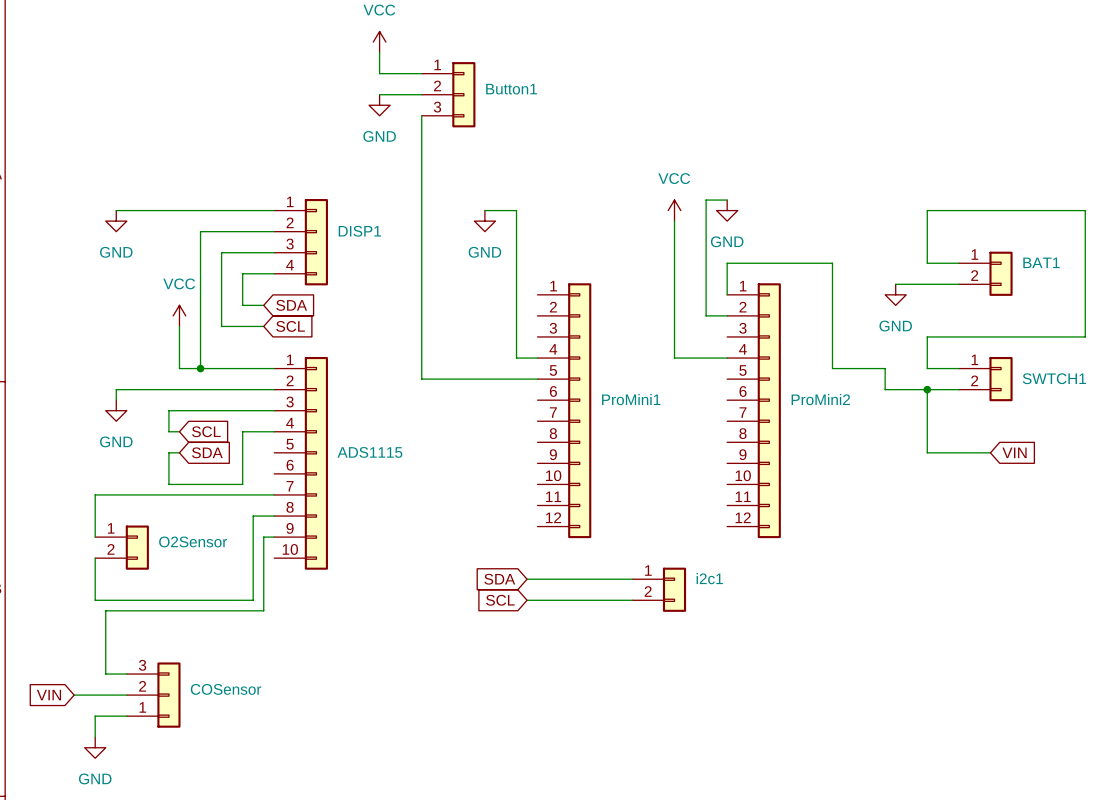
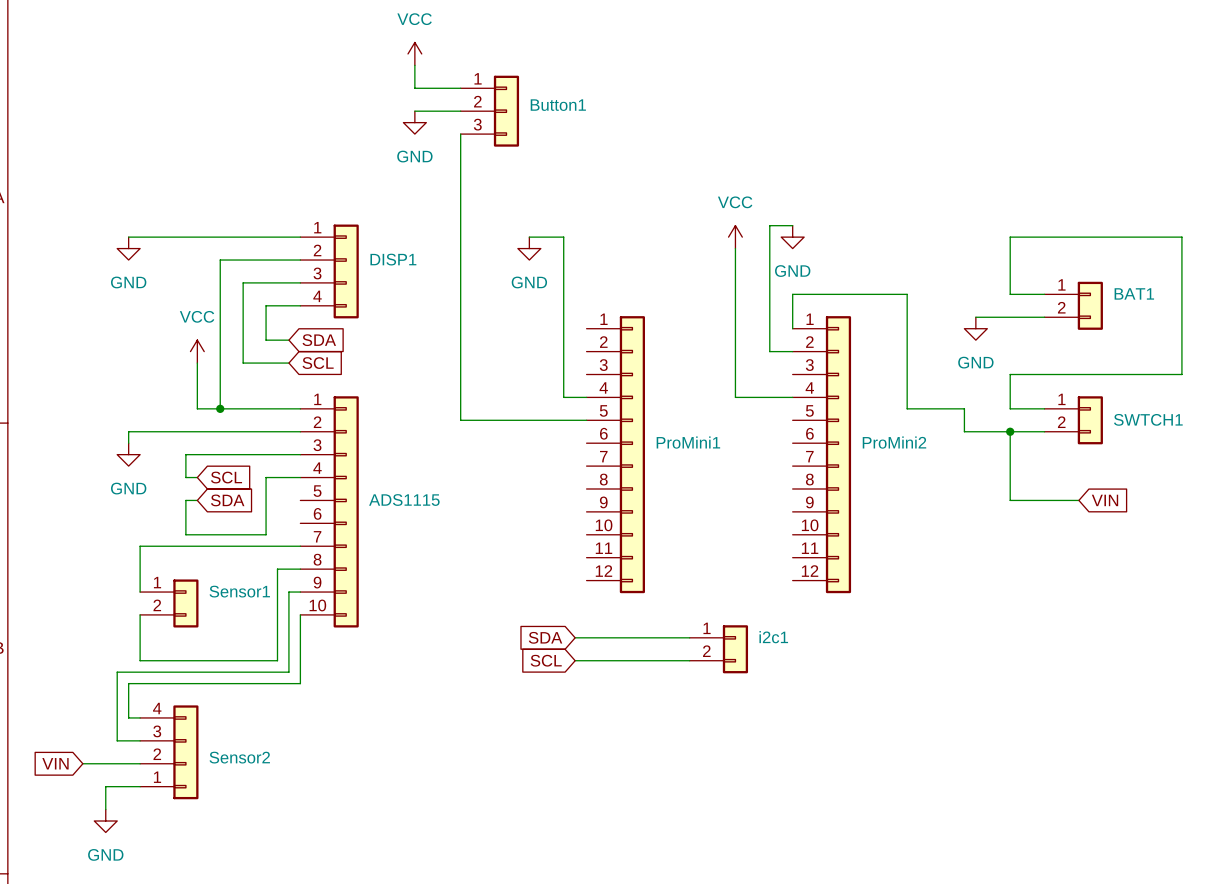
wire: (126, 494) (95, 494) (95, 537) -> (140, 546) (140, 592)
O2Sensor: (122, 547) -> none
Sensor1: none -> (169, 603)
wire: (95, 558) (95, 600) (126, 600) -> (140, 614) (140, 660)
wire: none -> (300, 614) (300, 683) (128, 683) (128, 717) (140, 717)
Sensor2: none -> (169, 752)
COSensor: (153, 695) -> none

